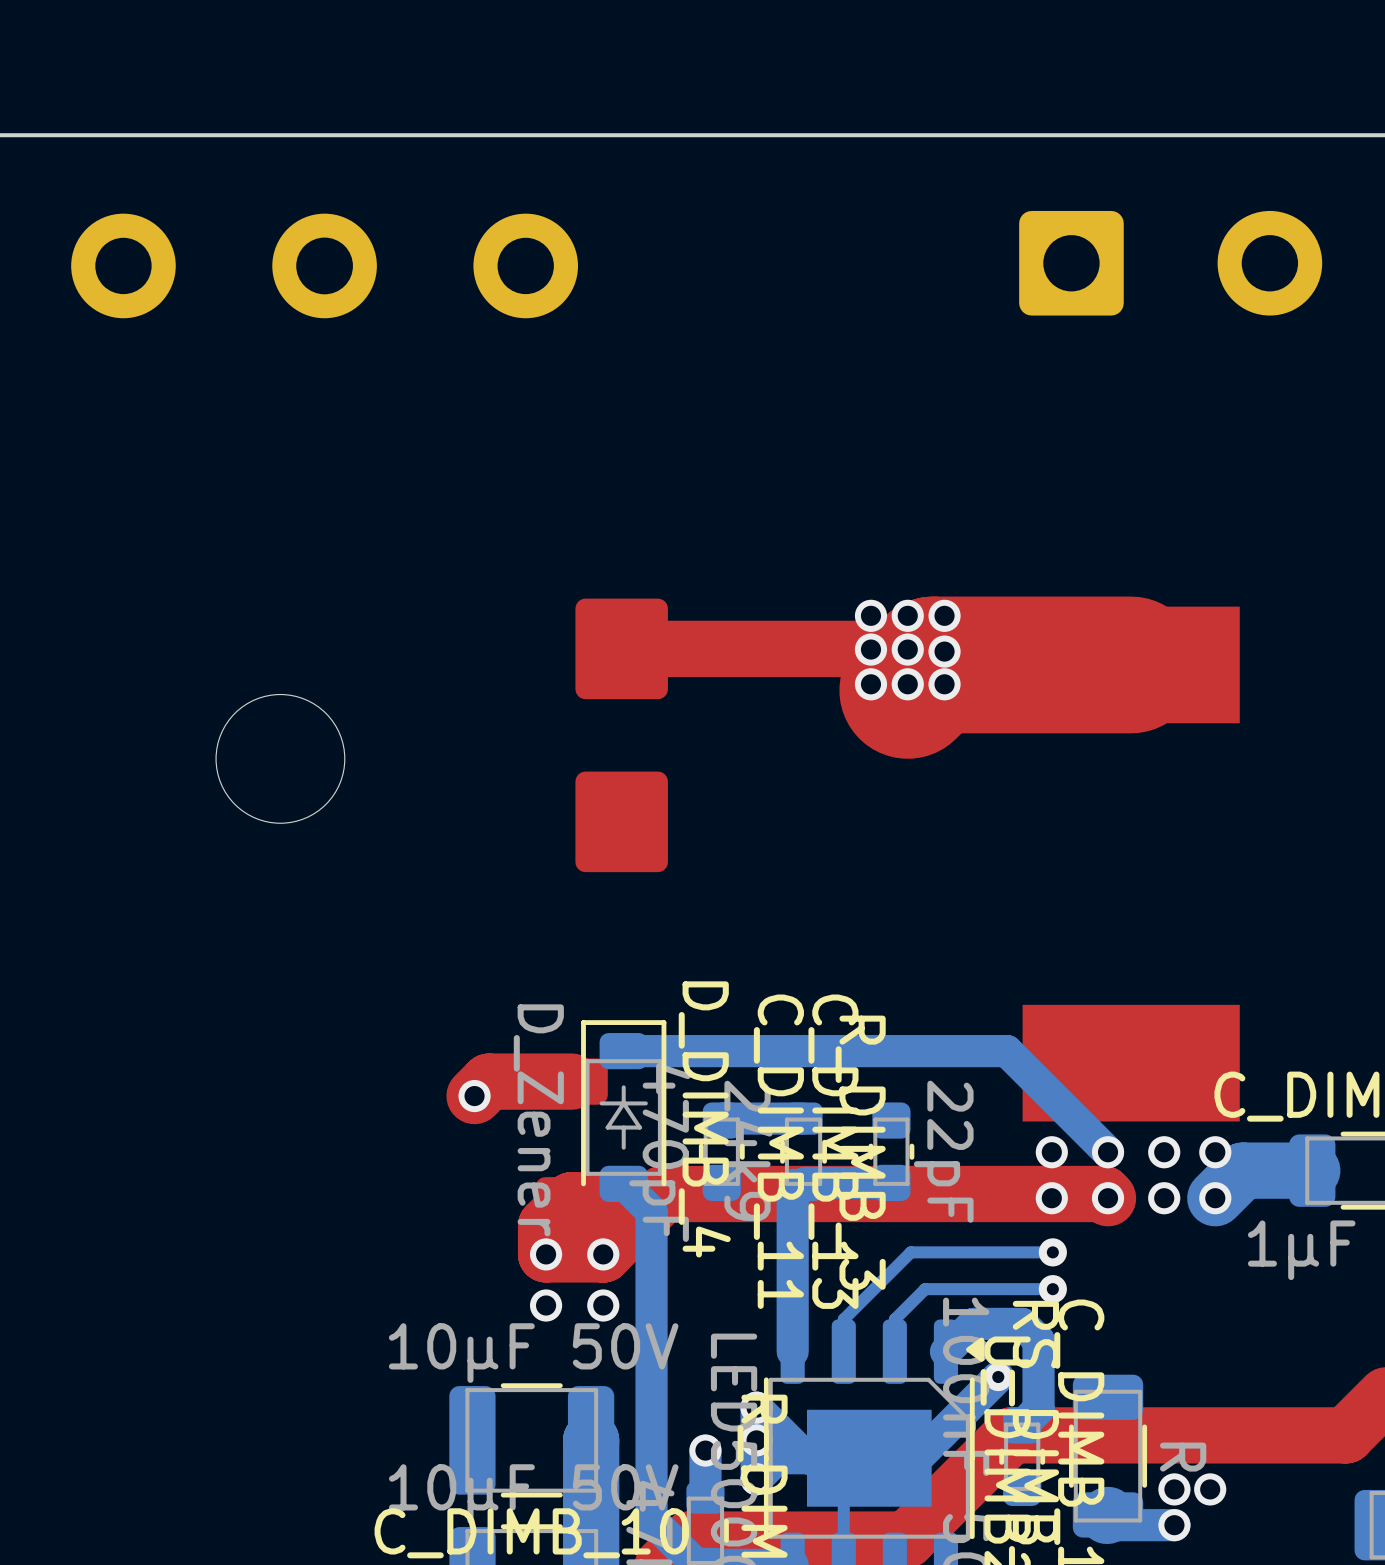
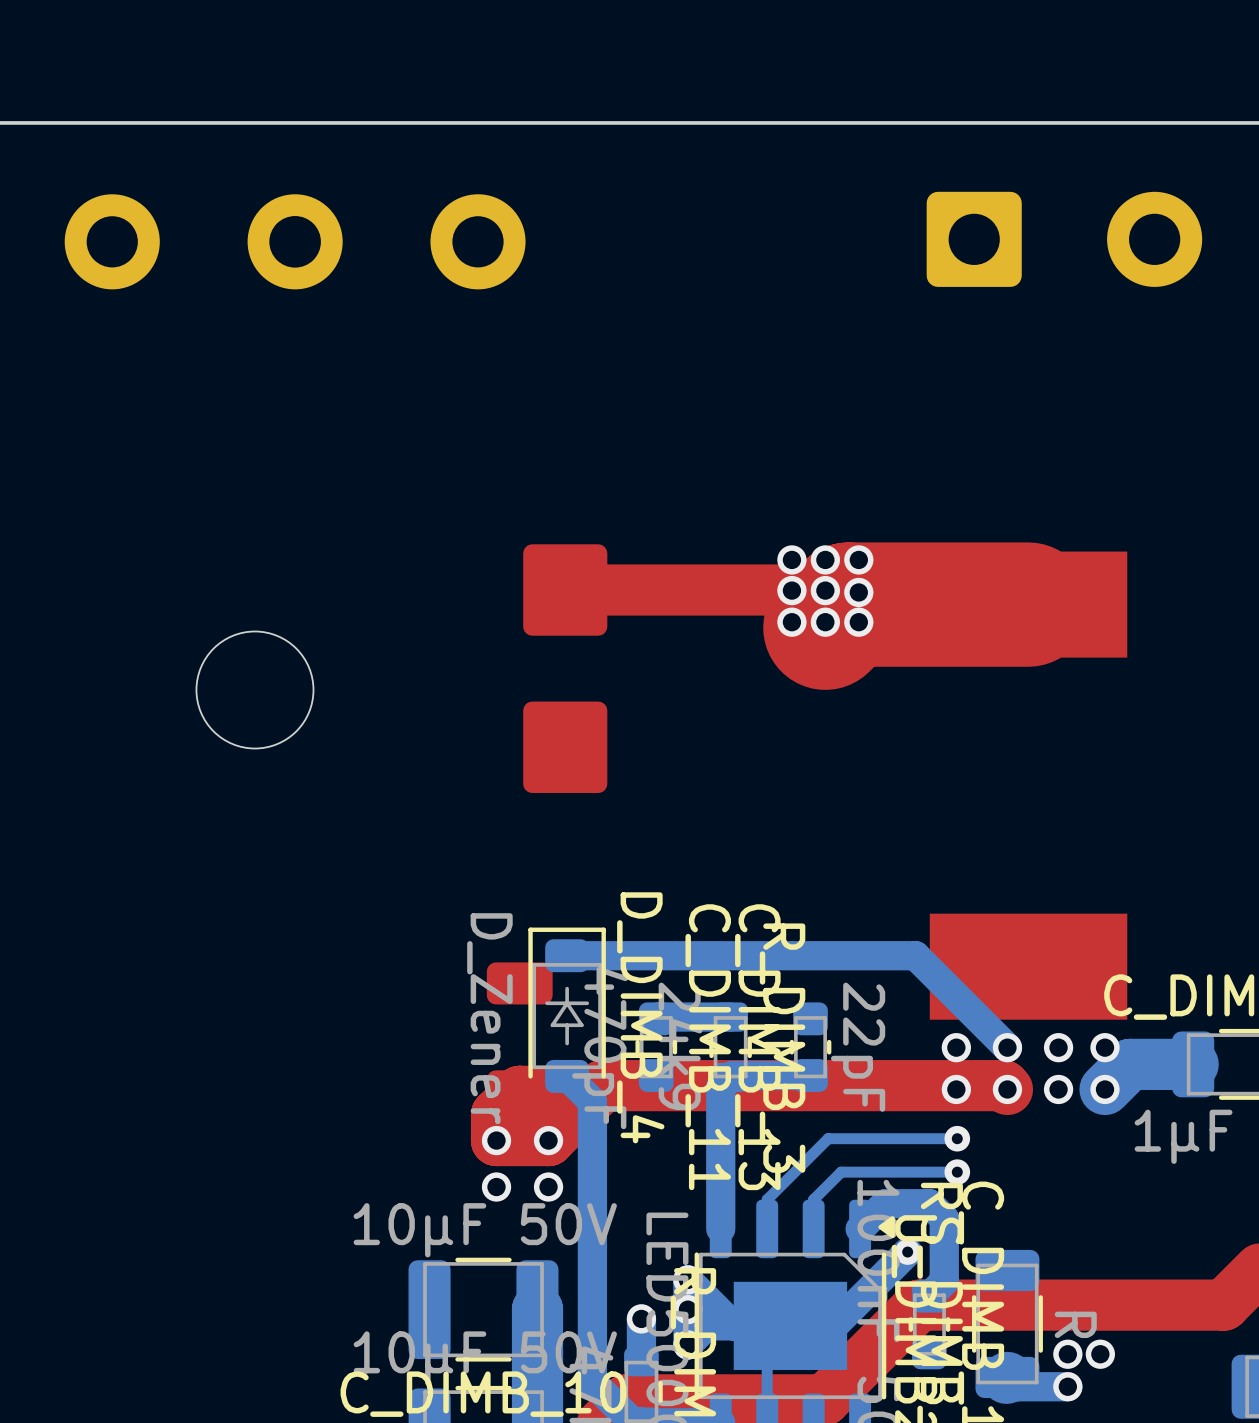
top track: (571, 1081) (489, 1081) (474, 1096) -> none
via: (474, 1096) -> none

